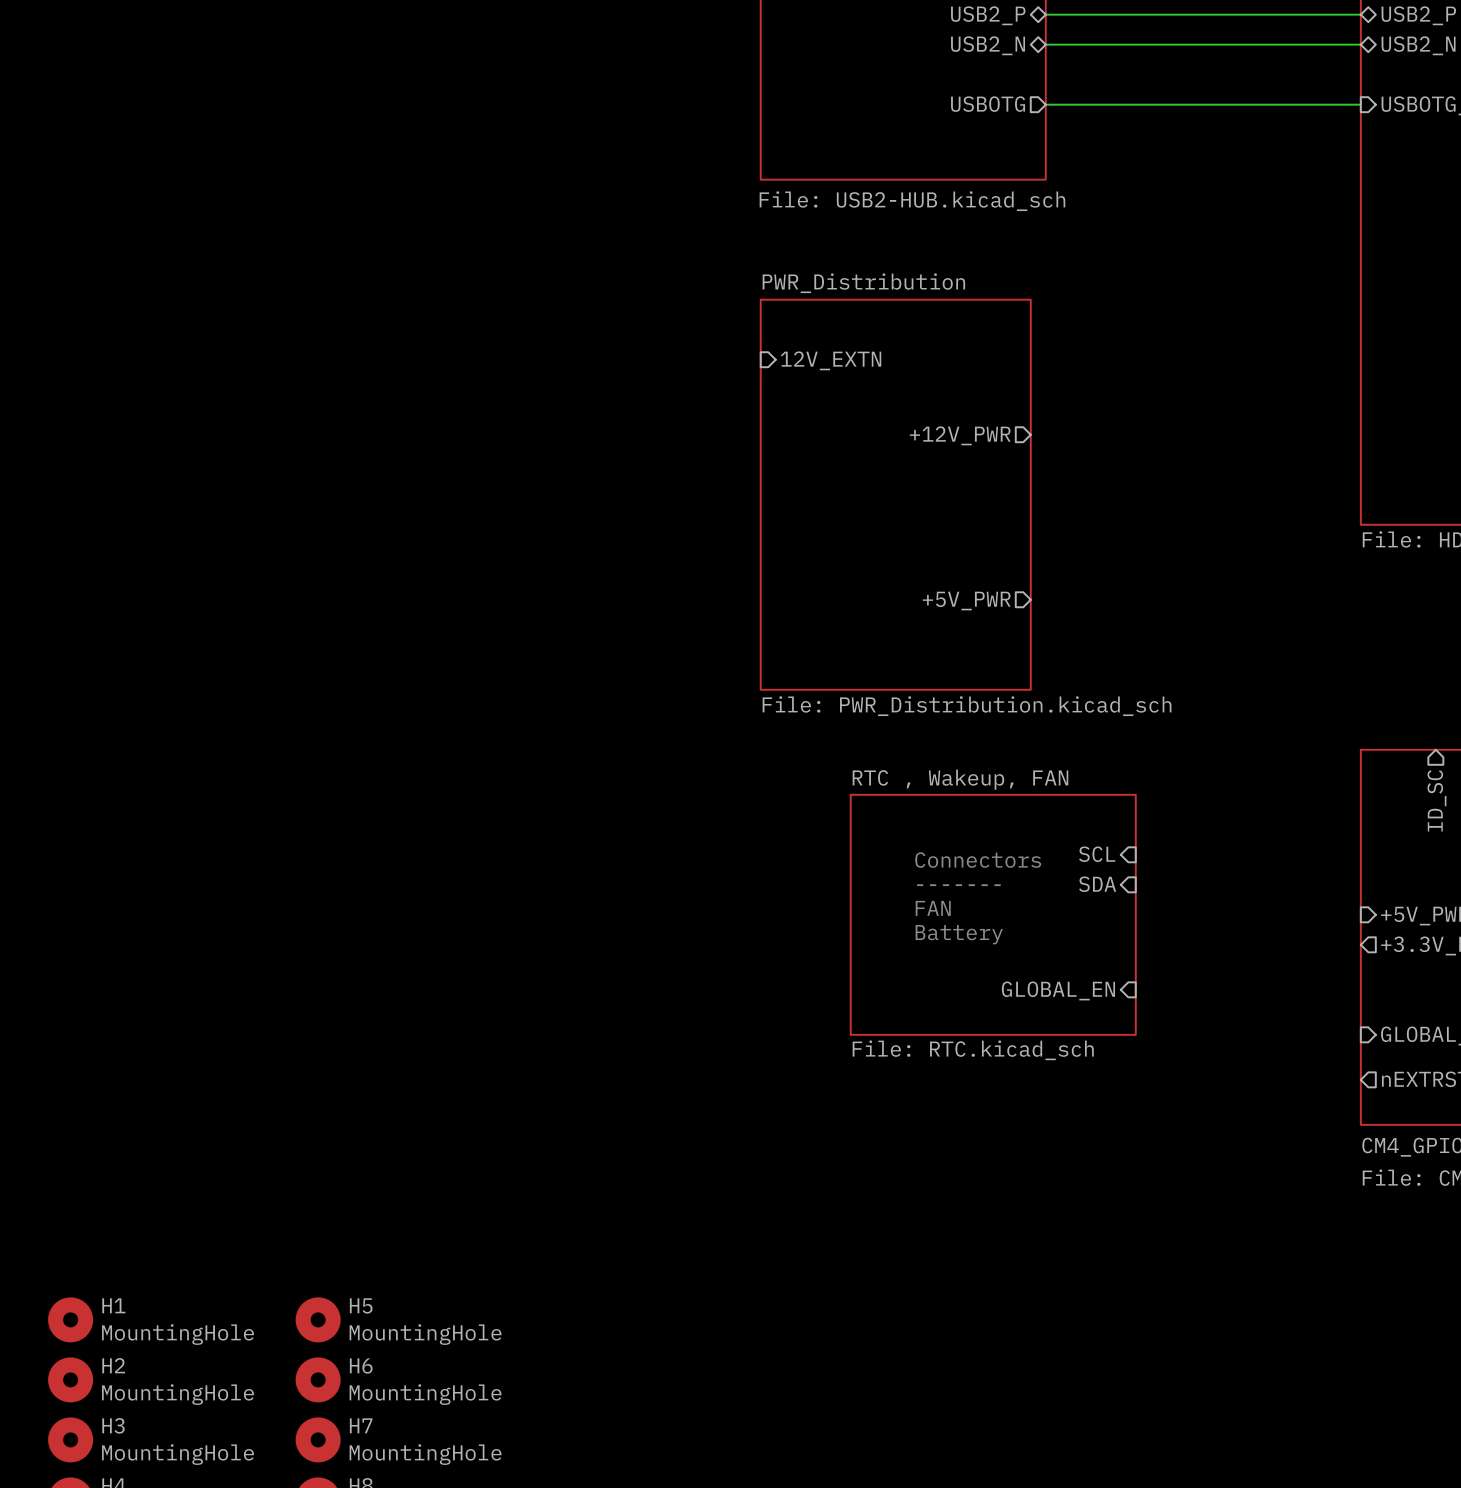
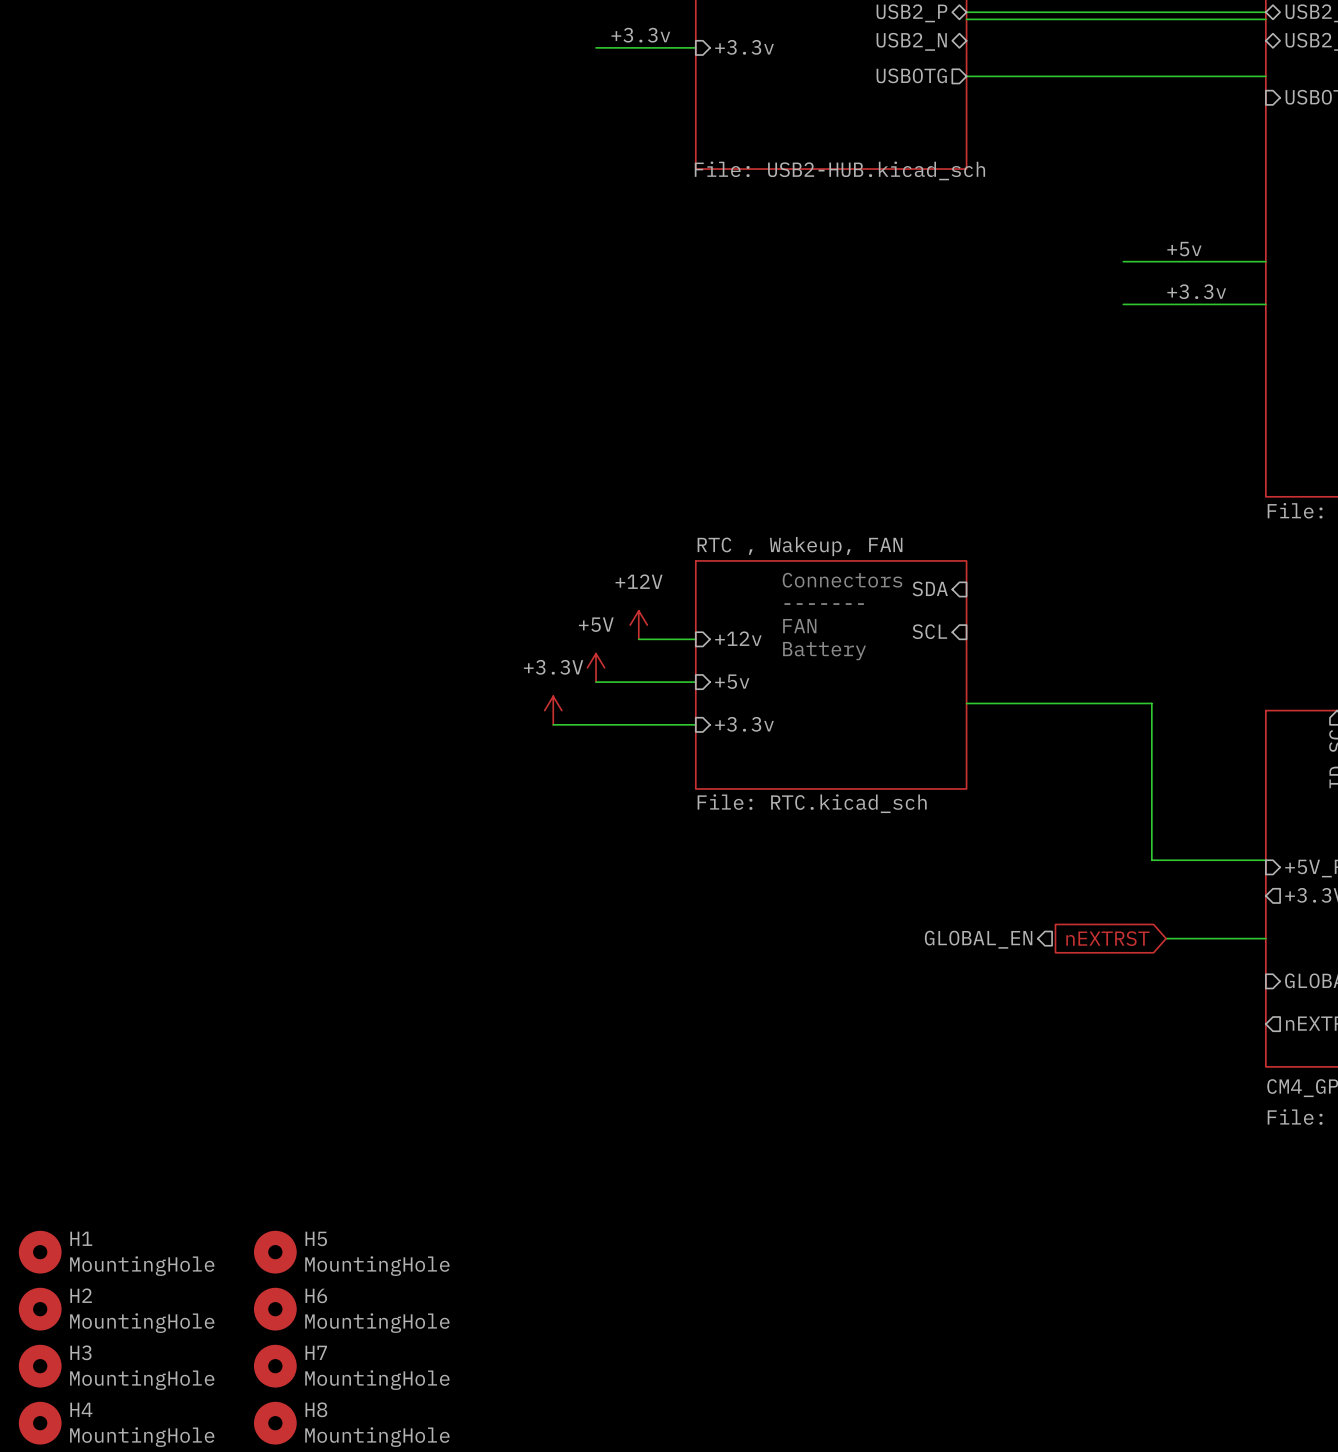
label: none -> +3.3v (640, 35)
wire: (1045, 44) (1360, 44) -> (966, 19) (1265, 19)
sheet pin: none -> +3.3v (744, 47)
wire: none -> (596, 47) (695, 47)
sheet pin position: USBOTG (988, 104) -> USBOTG (911, 75)
wire: (1045, 104) (1360, 104) -> (966, 76) (1265, 76)
sheet value position: File: USB2-HUB.kicad_sch (912, 201) -> File: USB2-HUB.kicad_sch (839, 170)
label: none -> +5v (1184, 249)
wire: none -> (1123, 261) (1265, 261)
label: none -> +3.3v (1196, 291)
wire: none -> (1123, 304) (1265, 304)
sheet pin: 12V_EXTN (831, 360) -> none
sheet pin: +12V_PWR (960, 435) -> none
sheet PWR_Distribution: File: PWR_Distribution.kicad_sch (895, 494) -> none
sheet pin: +5V_PWR (966, 601) -> none
power symbol: none -> +12V (638, 625)
wire: none -> (638, 639) (695, 639)
sheet pin: none -> +12v (738, 638)
power symbol: none -> +5V (596, 667)
wire: none -> (596, 682) (695, 682)
sheet pin: none -> +5v (732, 681)
wire: none -> (966, 703) (1151, 703) (1151, 860) (1265, 860)
power symbol: none -> +3.3V (553, 710)
wire: none -> (553, 724) (695, 724)
sheet pin: none -> +3.3v (744, 724)
sheet pin position: SCL (1097, 854) -> SCL (929, 631)
text position: Connectors (978, 860) -> Connectors (842, 580)
sheet pin position: SDA (1097, 884) -> SDA (930, 588)
text position: ------- (958, 885) -> ------- (824, 604)
text position: FAN (933, 908) -> FAN (799, 626)
sheet RTC , Wakeup, FAN position: (993, 914) -> (831, 674)
text position: Battery (959, 934) -> Battery (824, 651)
global label: none -> nEXTRST (1107, 938)
wire: none -> (1166, 938) (1265, 938)

